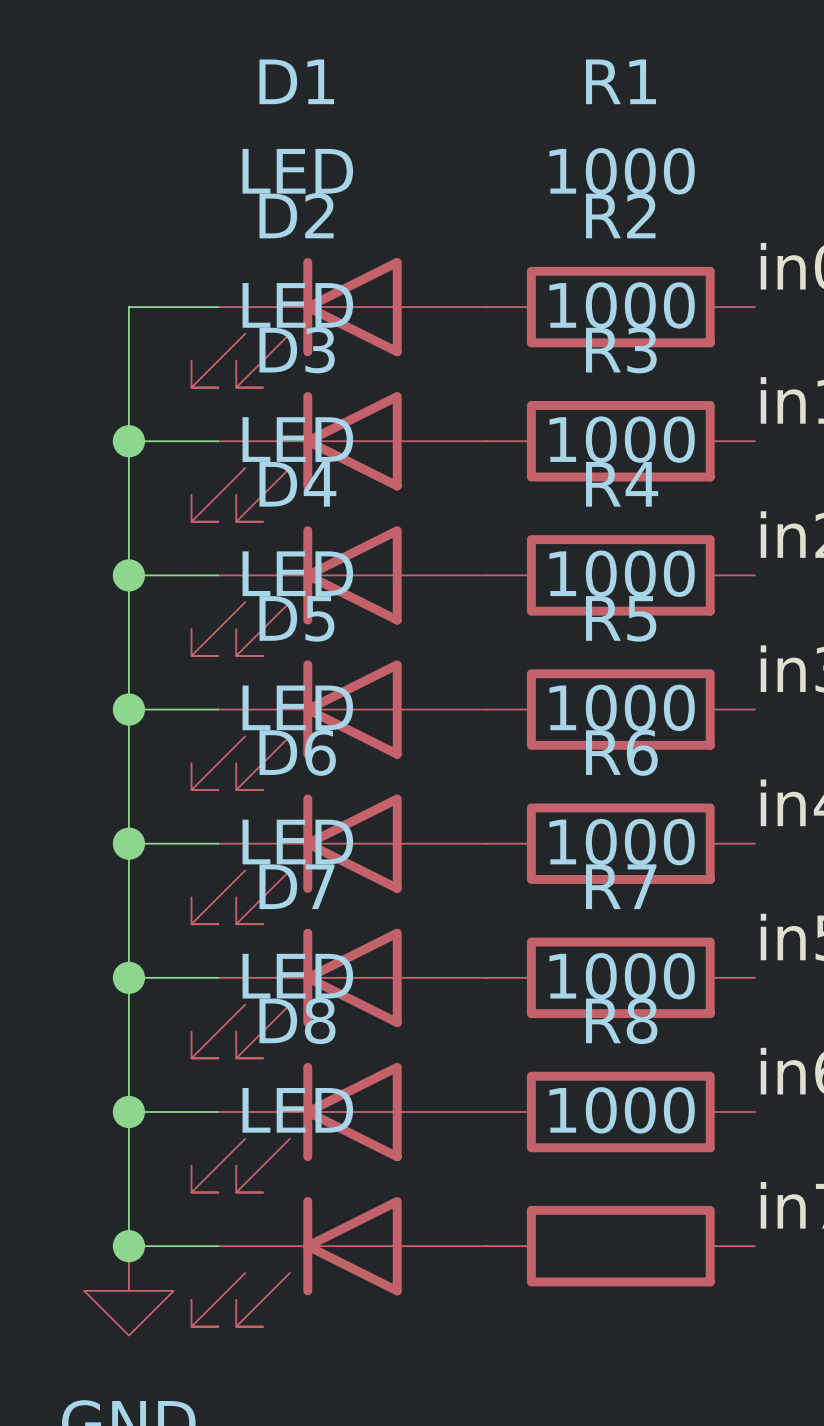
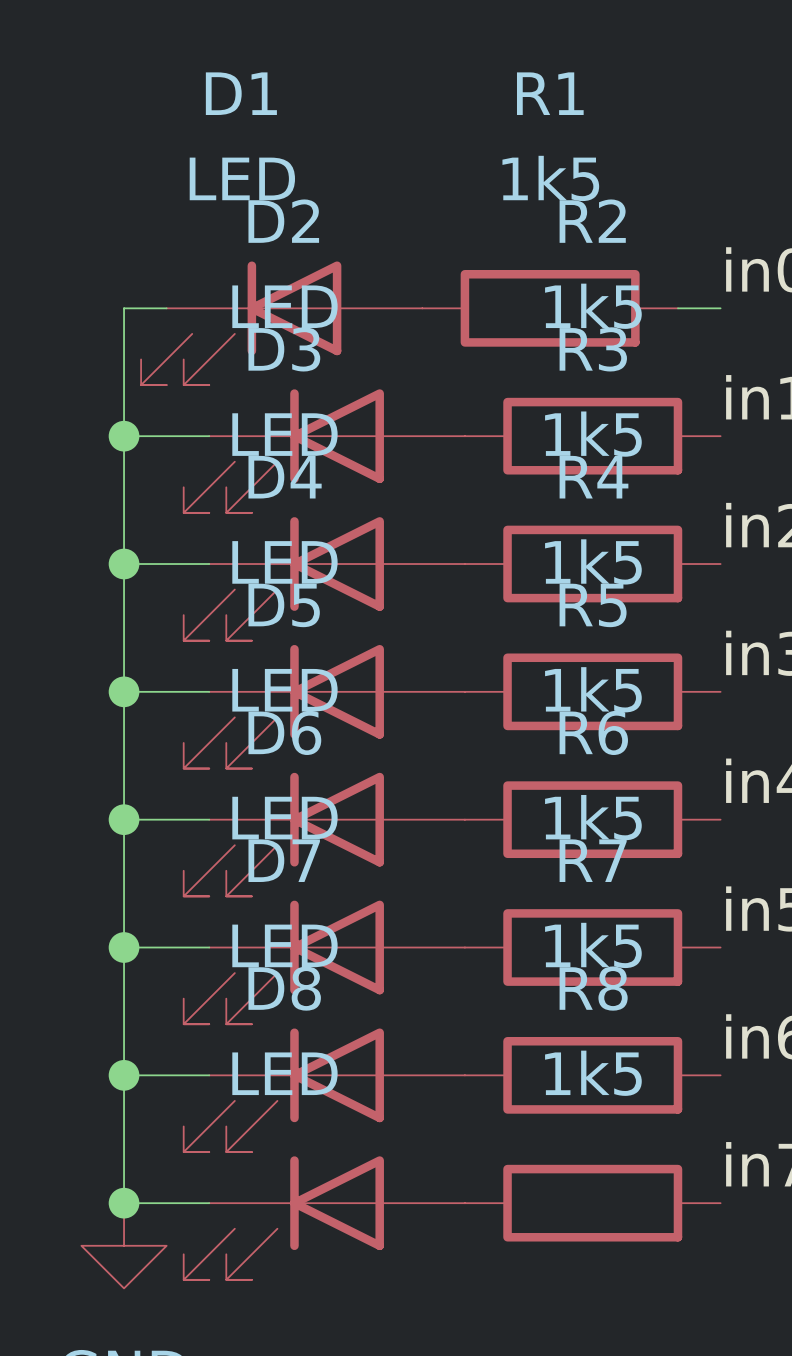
R1 value: 1000 (622, 171) -> 1k5 (550, 178)
R2 value: 1000 (622, 305) -> 1k5 (593, 306)
R1 position: (620, 307) -> (550, 308)
D1 position: (339, 322) -> (281, 323)
R3 value: 1000 (622, 439) -> 1k5 (593, 434)
R4 value: 1000 (622, 573) -> 1k5 (593, 561)
R5 value: 1000 (622, 707) -> 1k5 (593, 689)
R6 value: 1000 (622, 842) -> 1k5 (593, 817)
R7 value: 1000 (622, 976) -> 1k5 (593, 945)
R8 value: 1000 (622, 1110) -> 1k5 (593, 1073)

